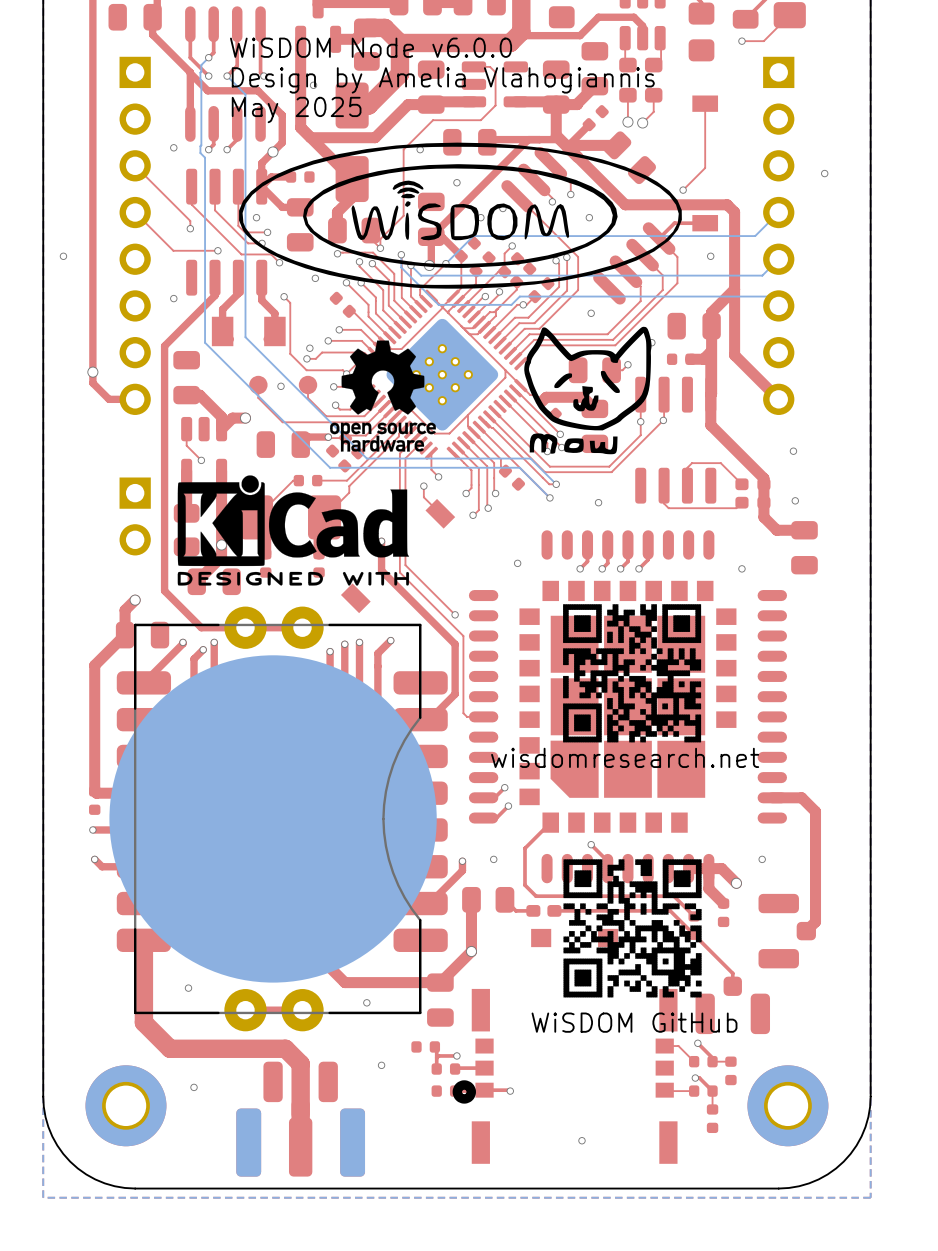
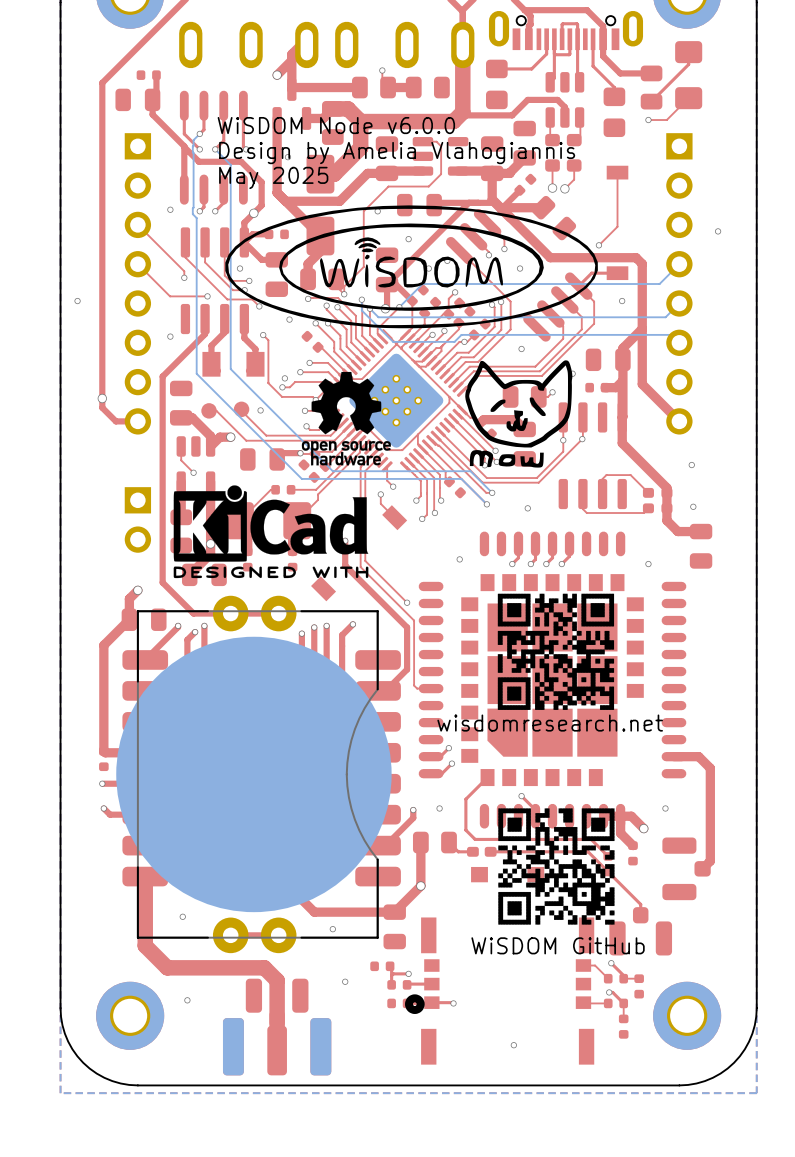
top track: (258, 385) (258, 398) (282, 422) -> (209, 410) (216, 410) (246, 440) (261, 440)
top track: (308, 385) (308, 398) (326, 416) -> (241, 410) (266, 435) (298, 435)
part position: (308, 385) -> (209, 410)

